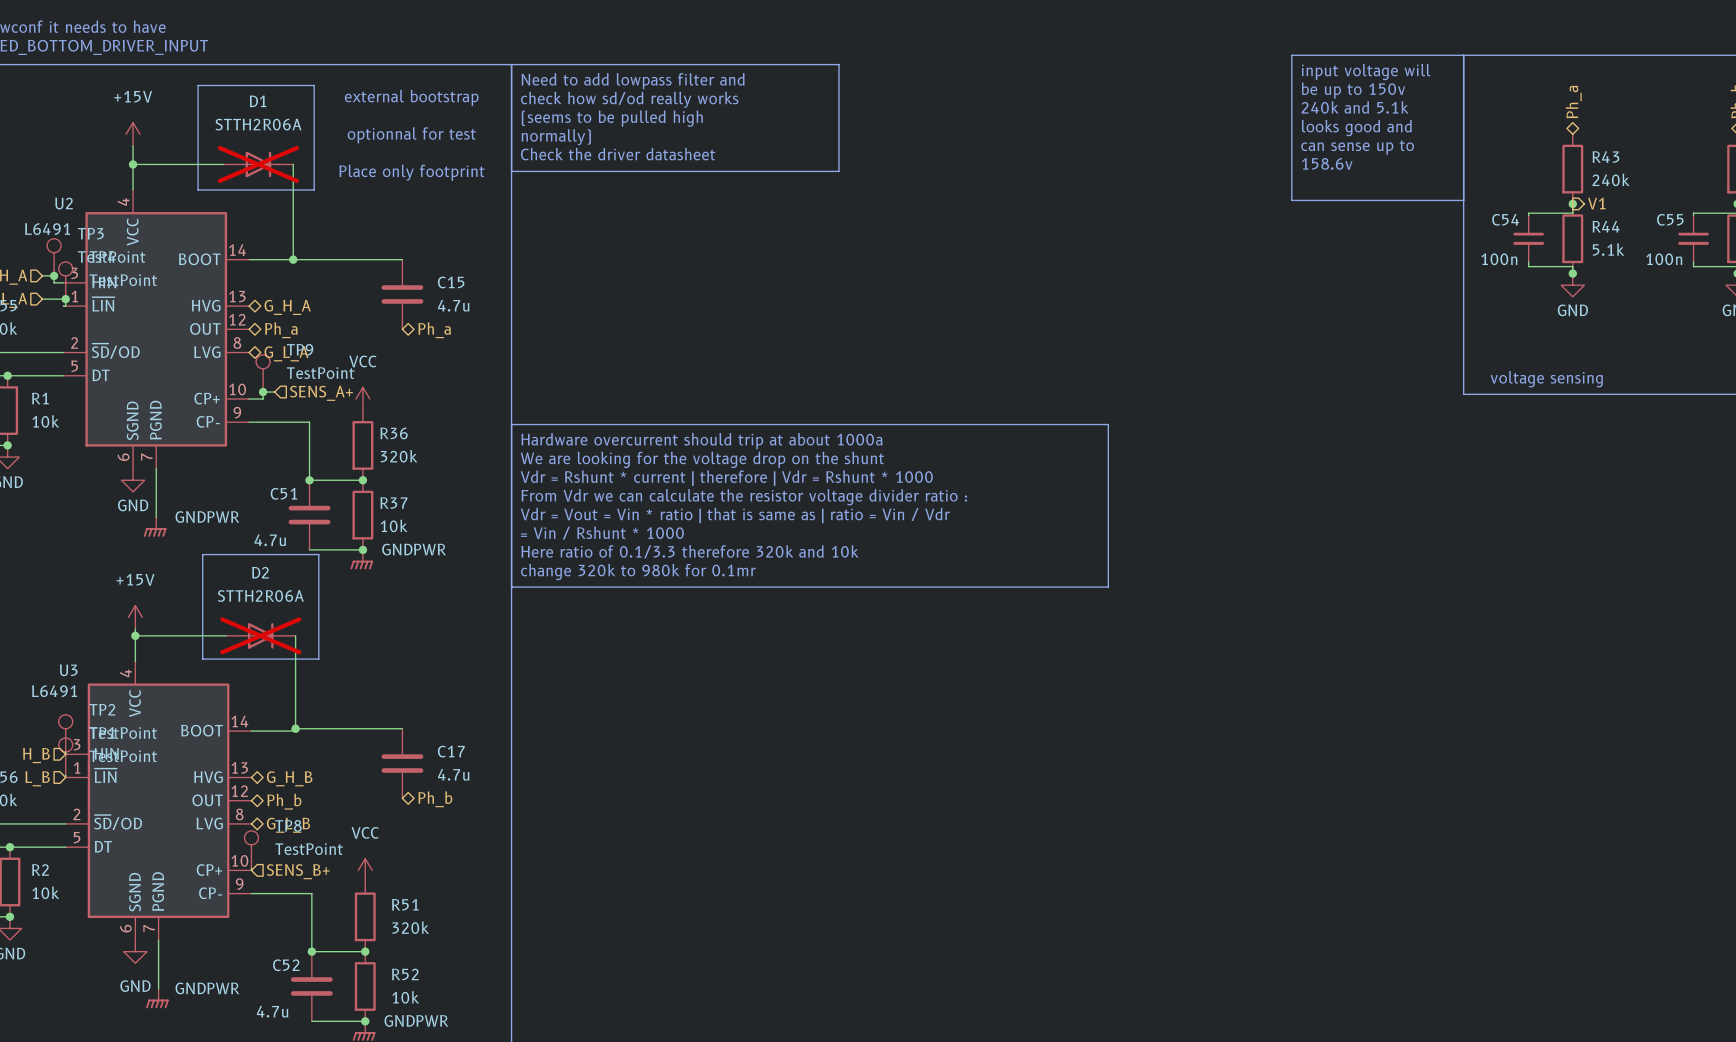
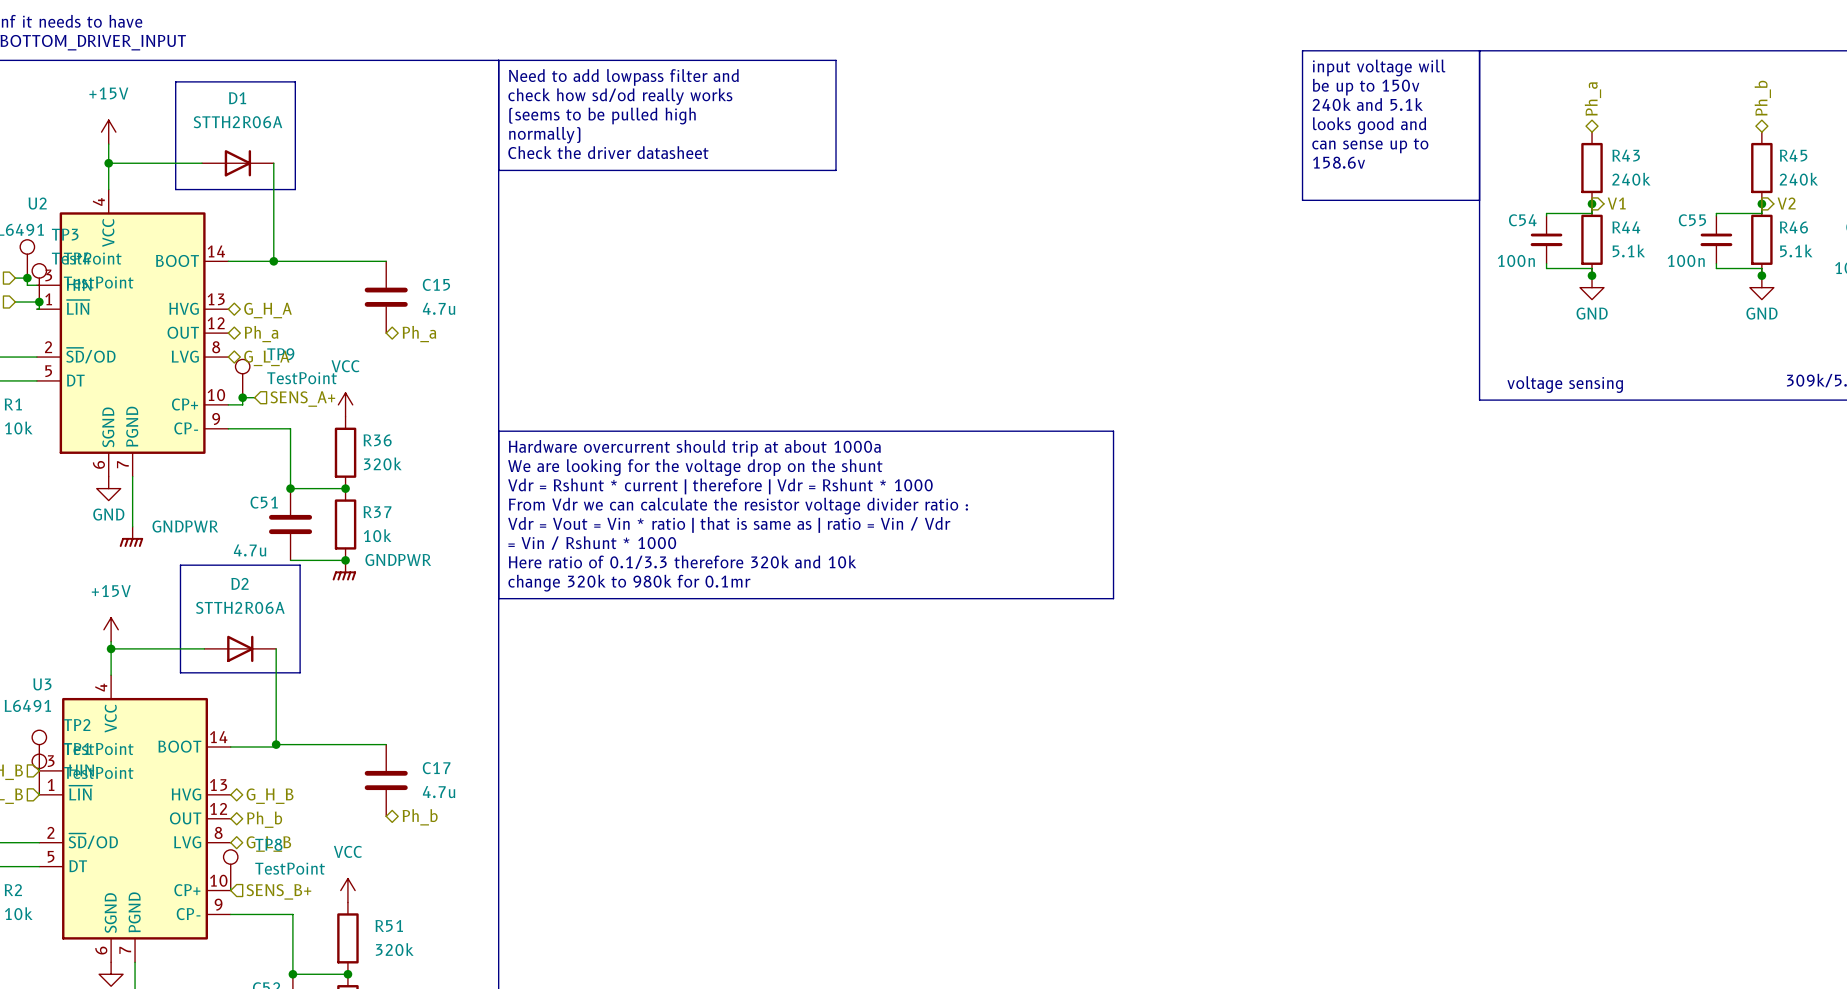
text: external bootstrap (411, 97) -> none
text: optionnal for test (411, 135) -> none
D1 do-not-place cross: (258, 164) -> none
text: Place only footprint (412, 172) -> none
D2 do-not-place cross: (260, 635) -> none

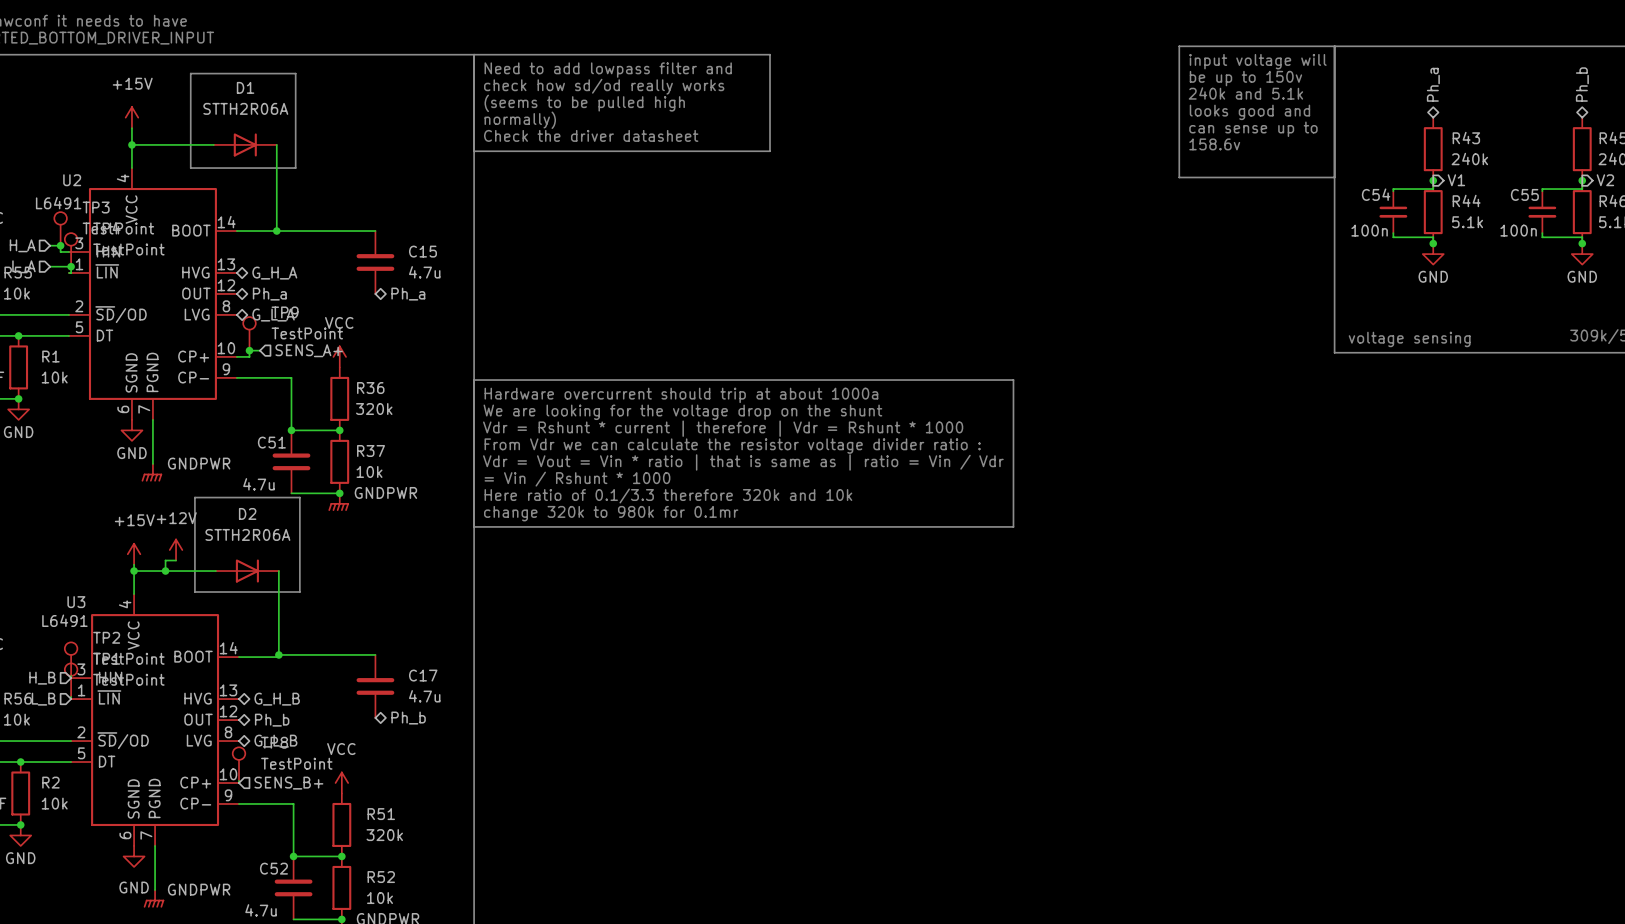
power symbol: none -> +12V (176, 550)
wire: none -> (176, 560) (165, 560) (165, 571)
junction: none -> (165, 571)

